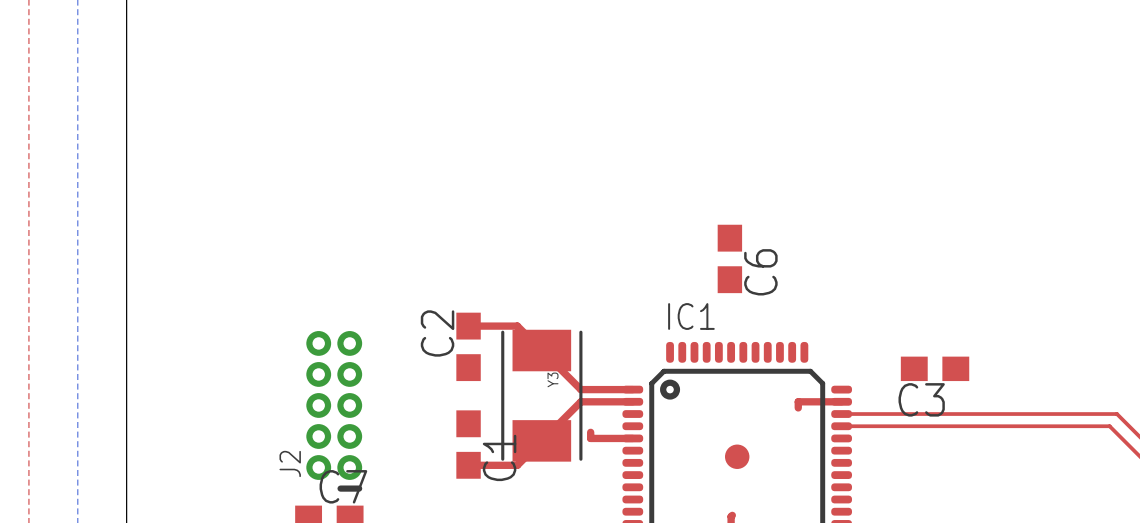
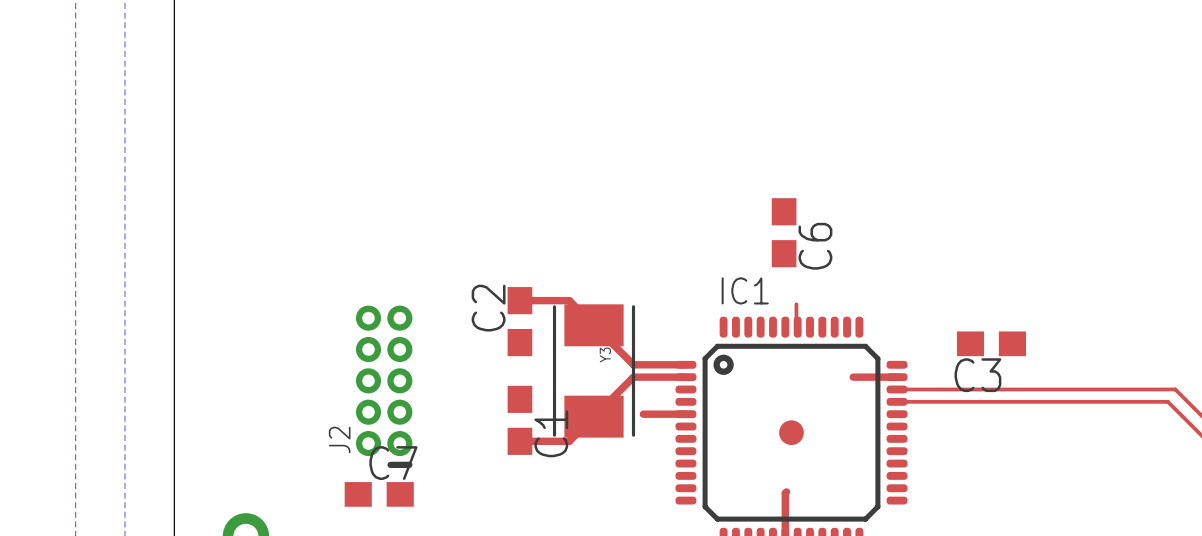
top track: none -> (796, 304) (797, 327)
top track: (798, 401) (798, 407) -> none
top track: (590, 432) (590, 438) -> none

